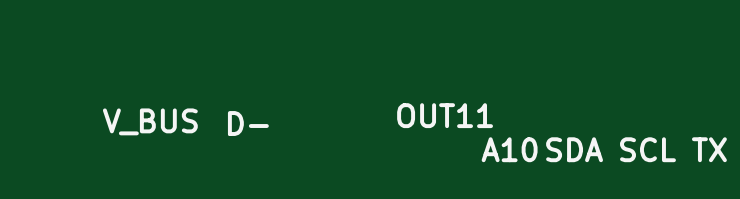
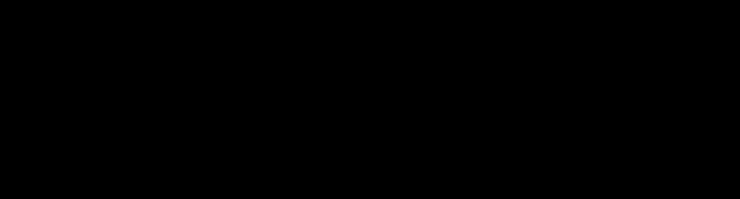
text: OUT11 (445, 115) -> none
text: V_BUS (150, 121) -> none
text: D- (248, 123) -> none
text: A10 (509, 149) -> none
text: SDA (574, 149) -> none
text: SCL (647, 149) -> none
text: TX (709, 149) -> none

